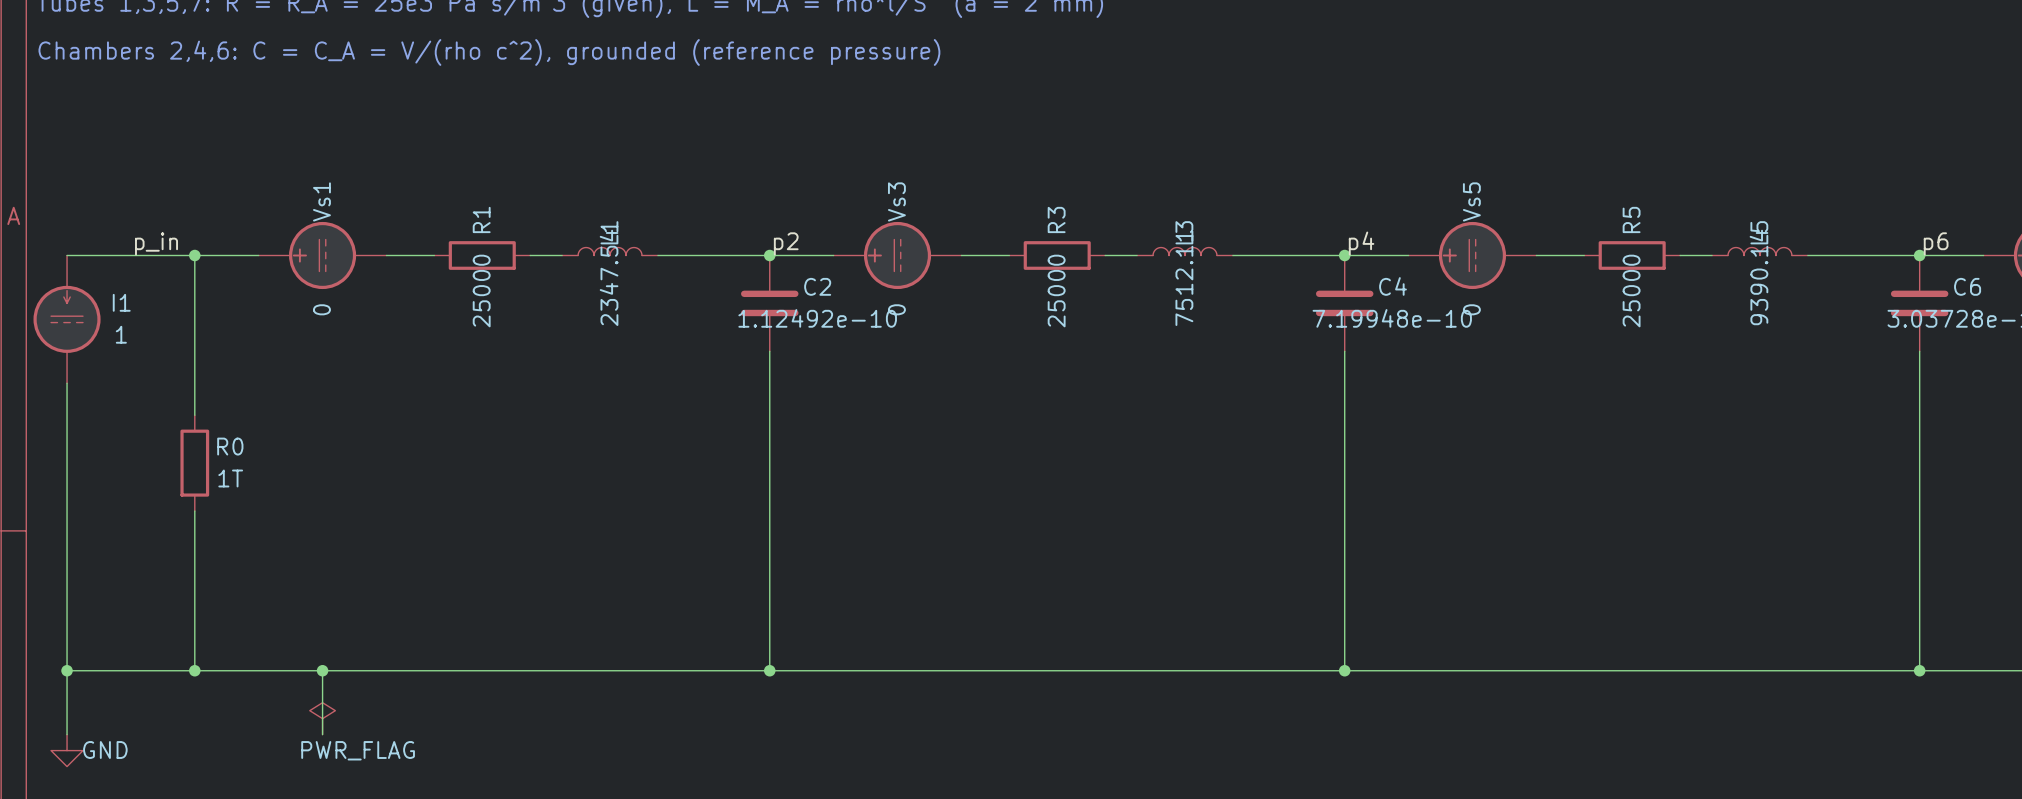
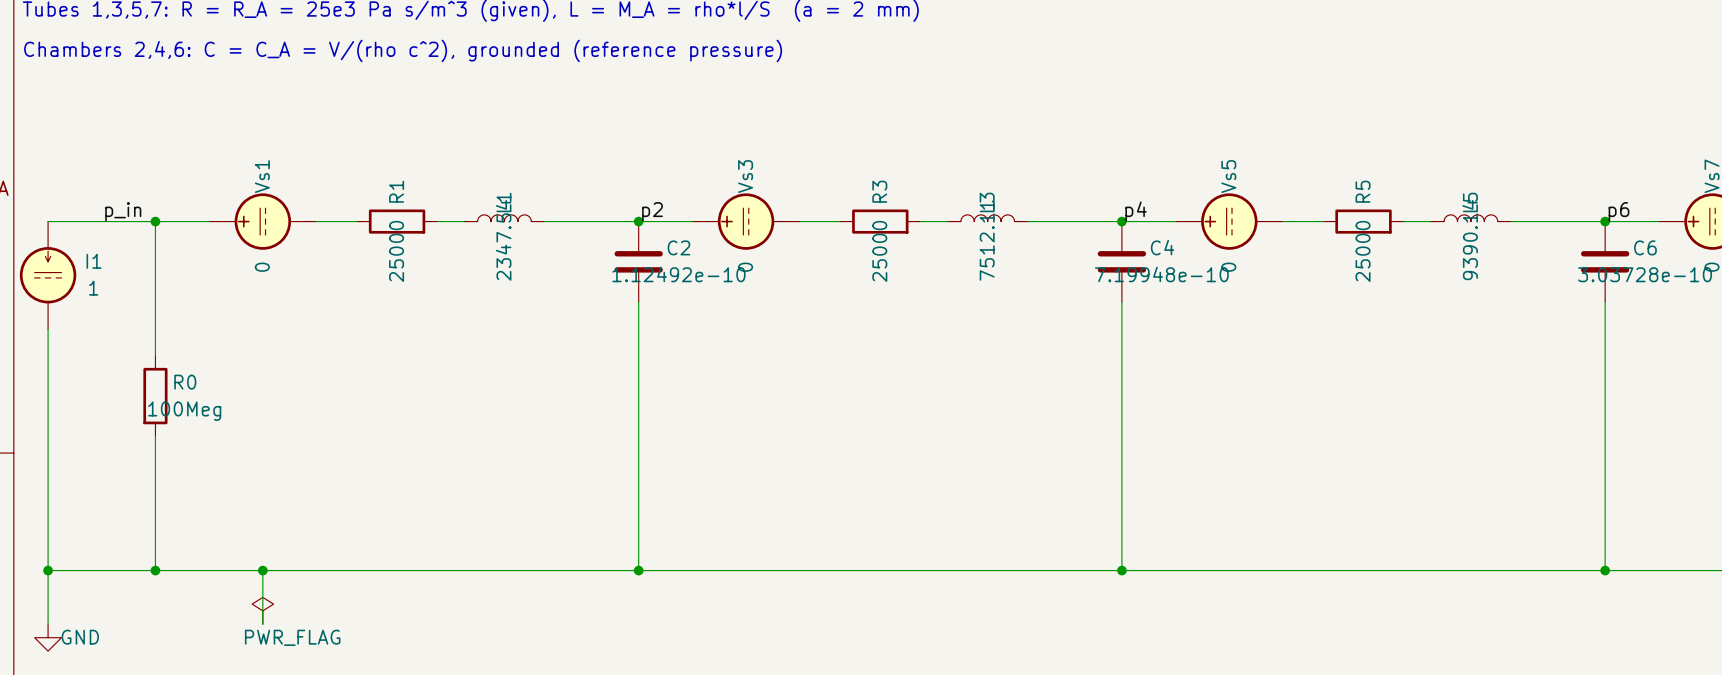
R0 value: 1T (230, 478) -> 100Meg (184, 411)

